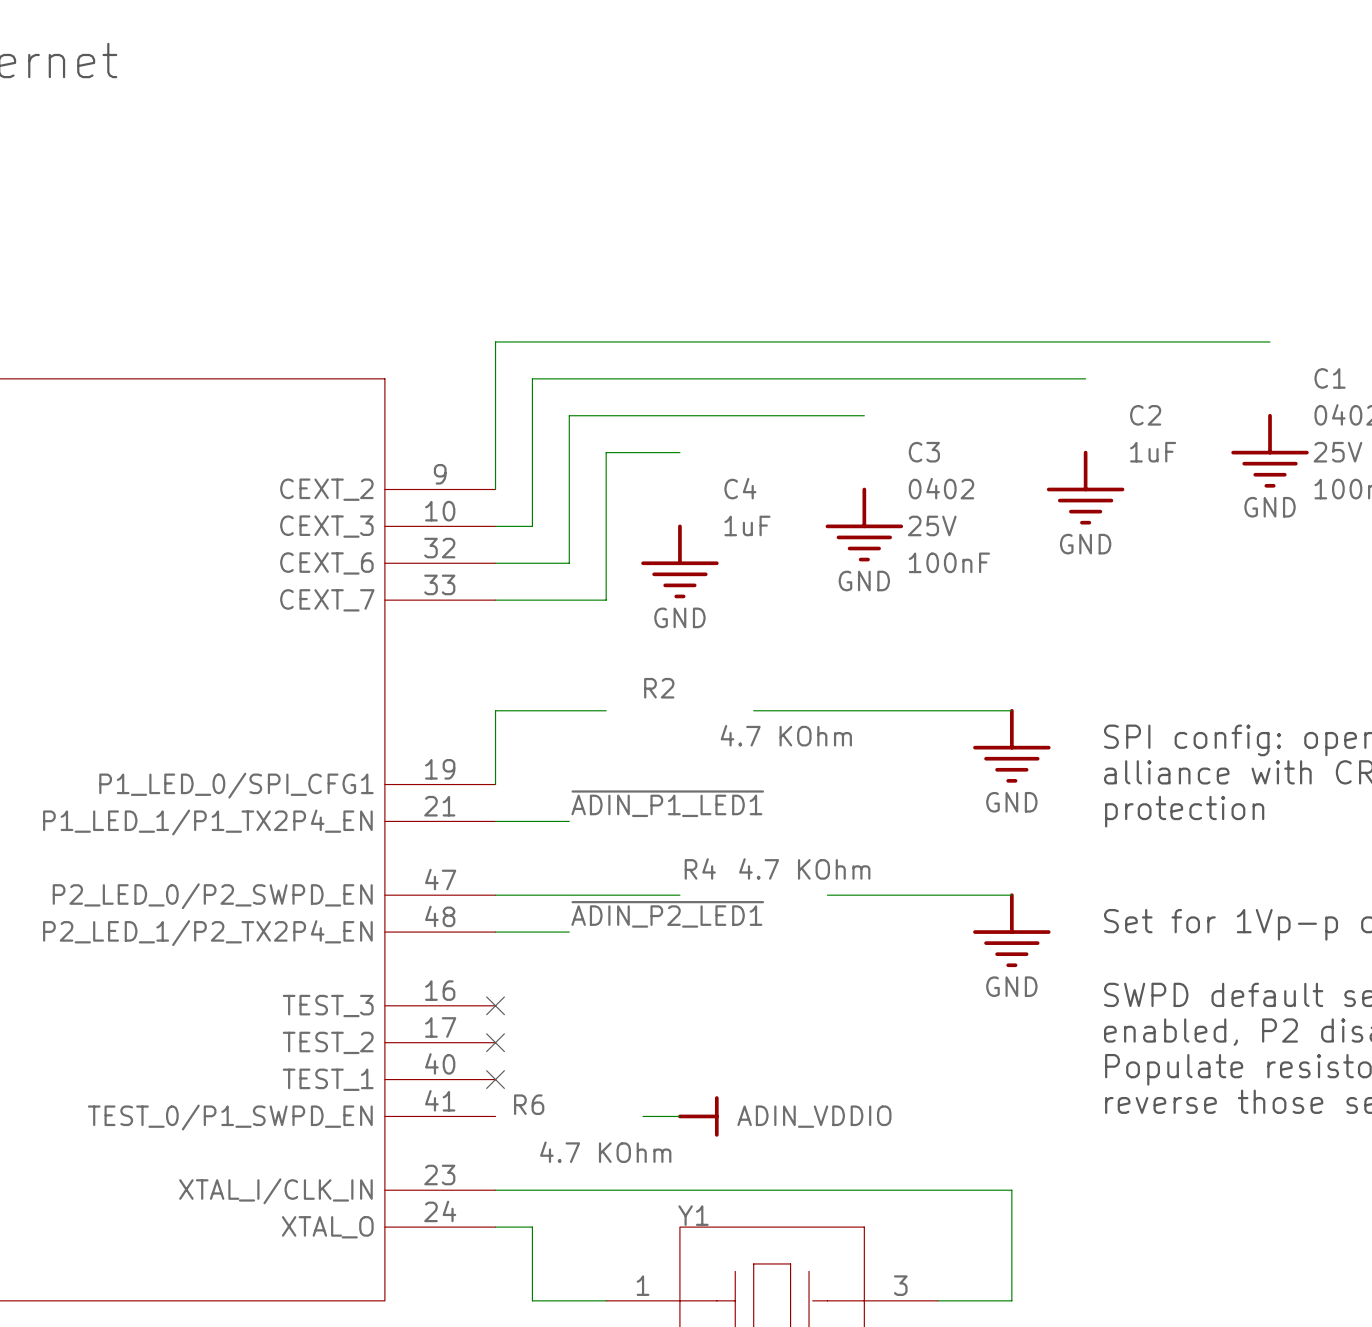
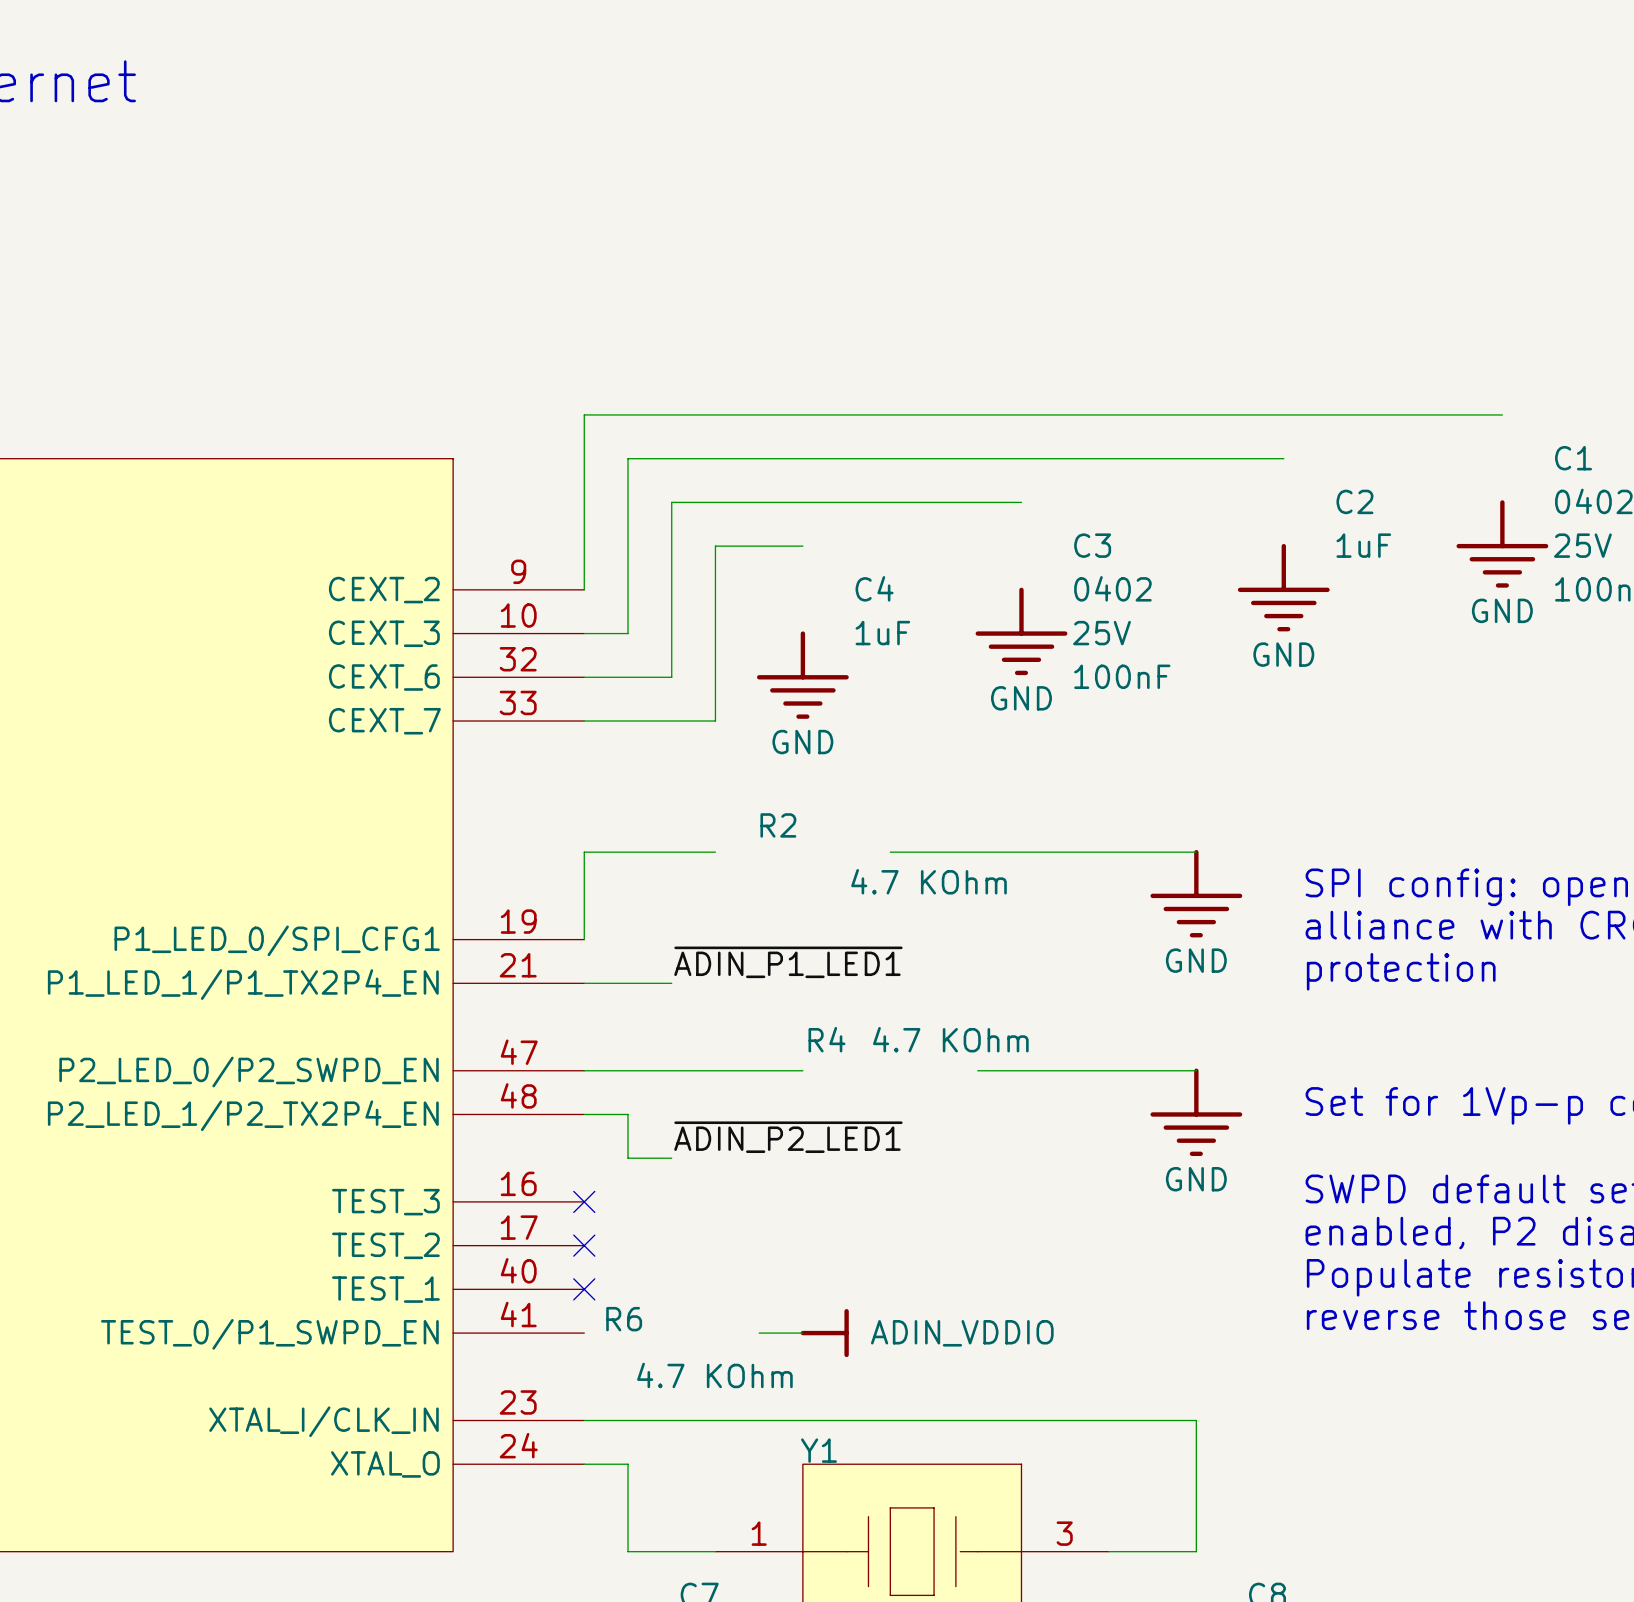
label position: ~{ADIN_P2_LED1} (667, 914) -> ~{ADIN_P2_LED1} (788, 1137)
wire: (532, 932) (569, 932) -> (628, 1114) (628, 1158) (671, 1158)

